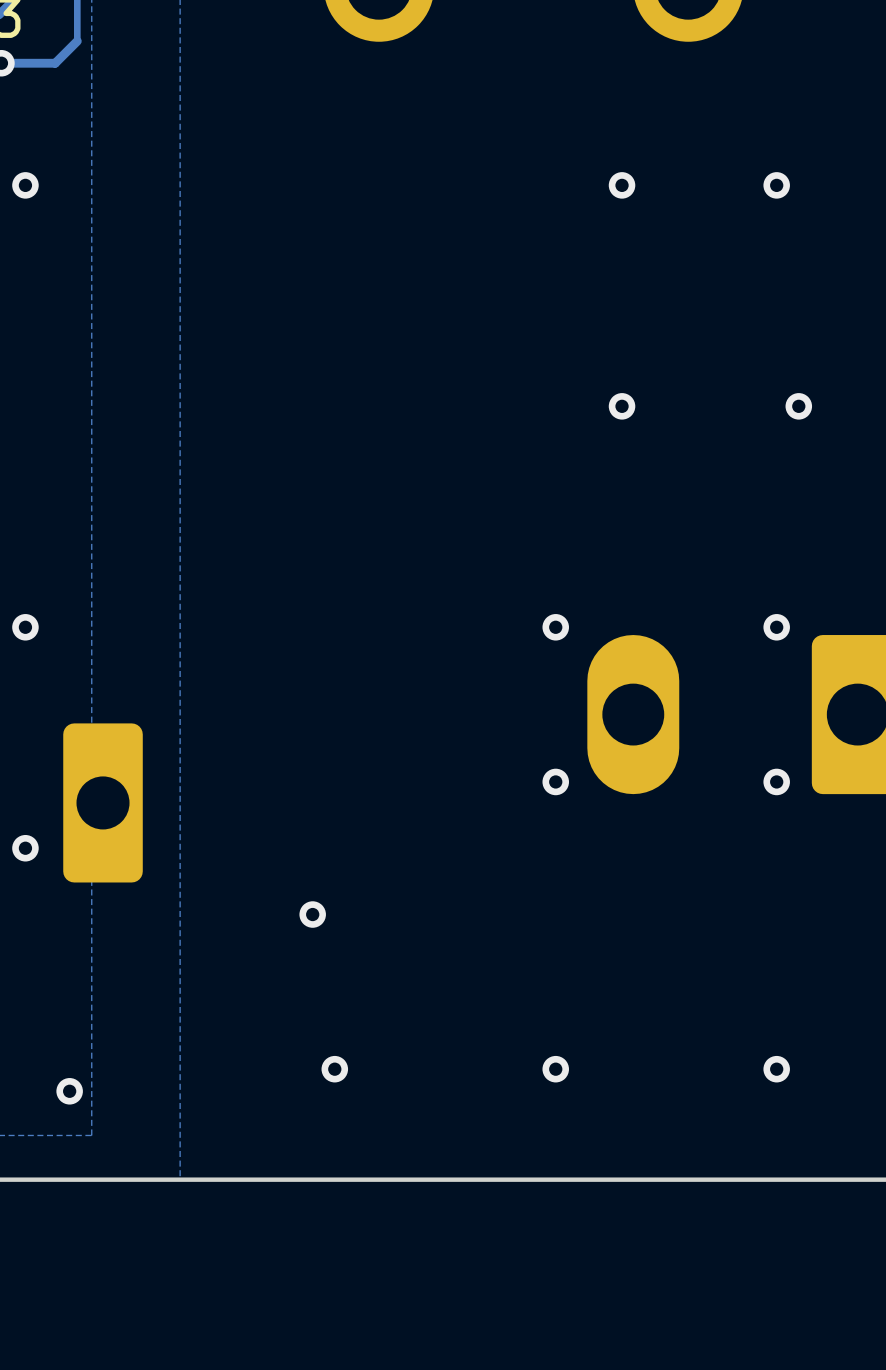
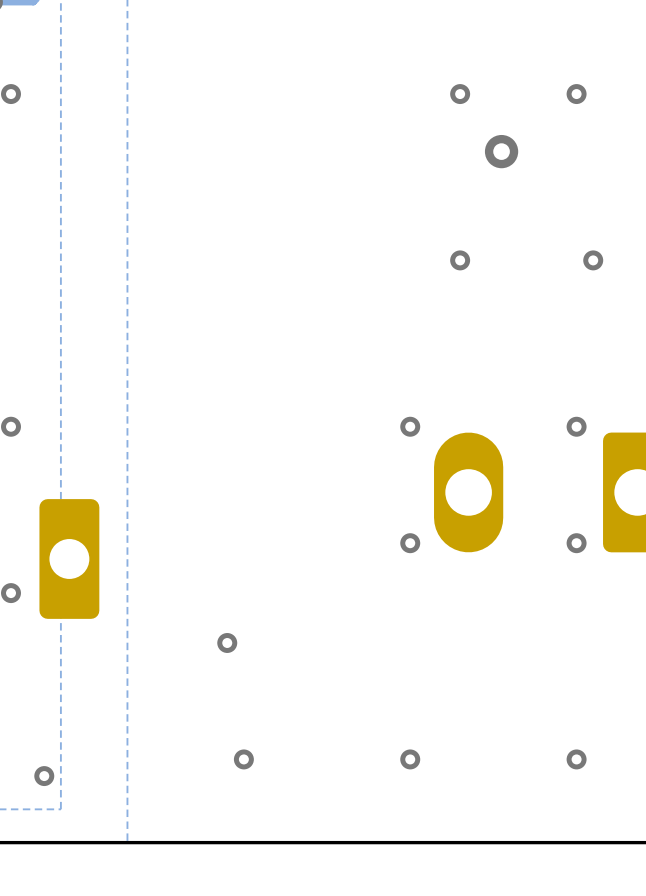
via: none -> (501, 151)

